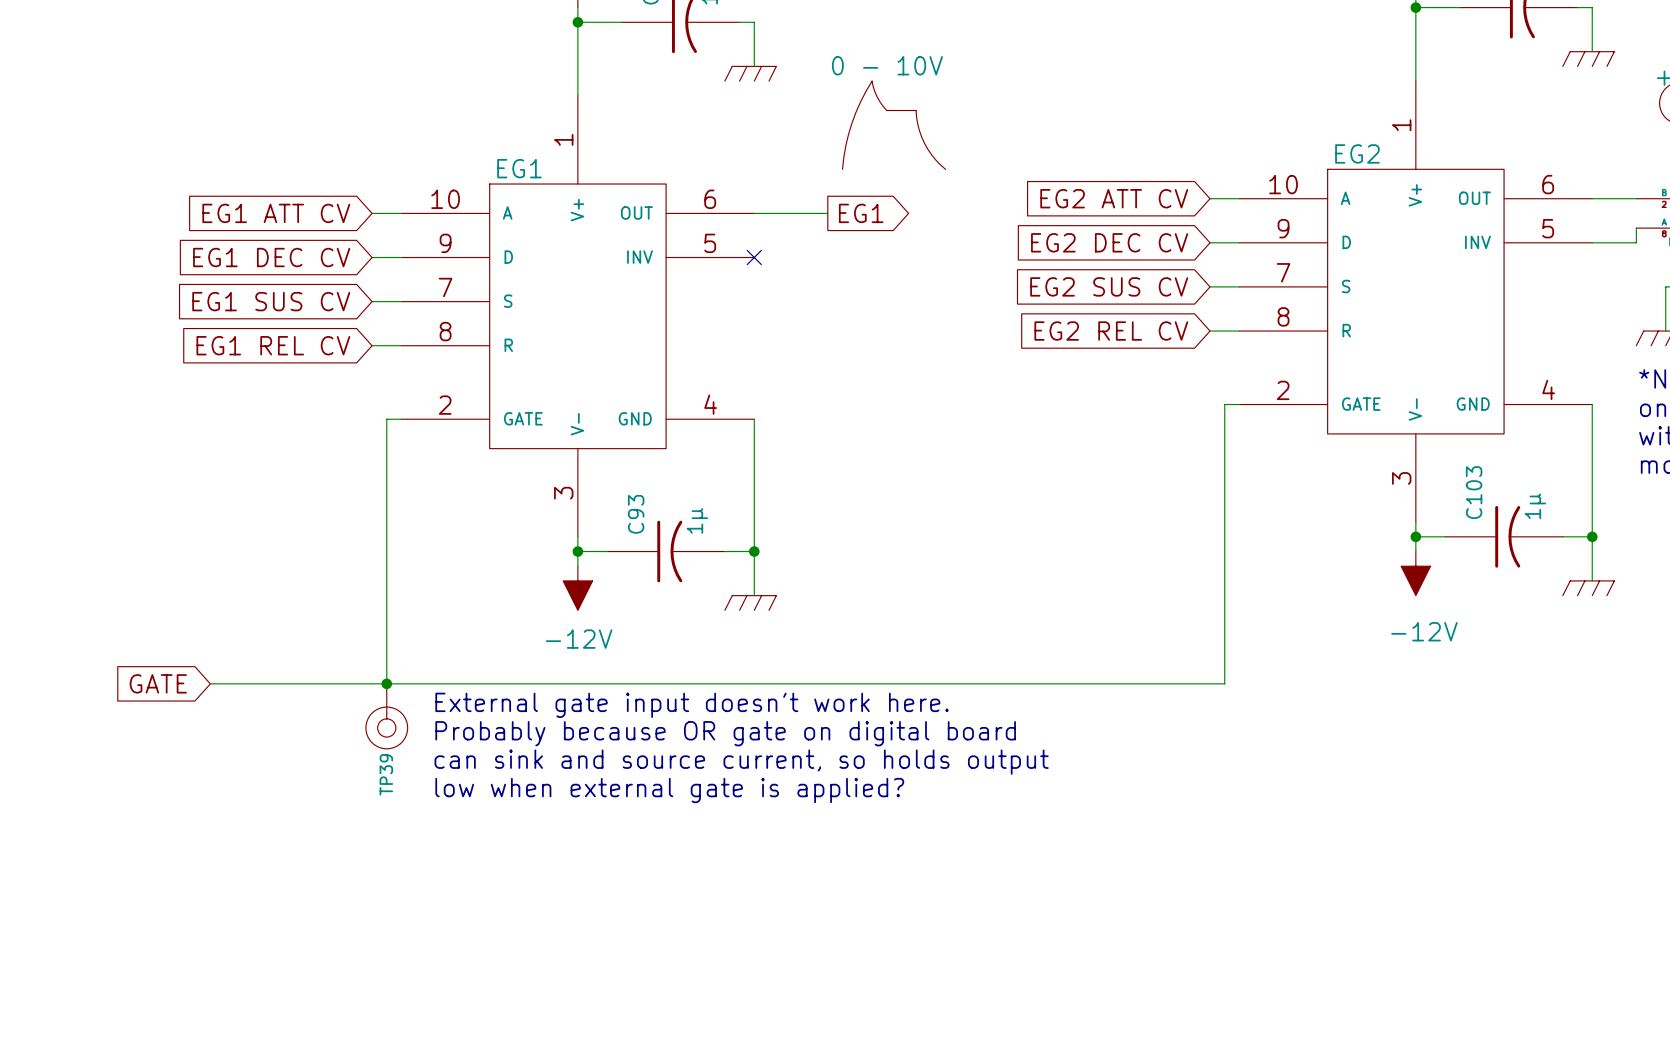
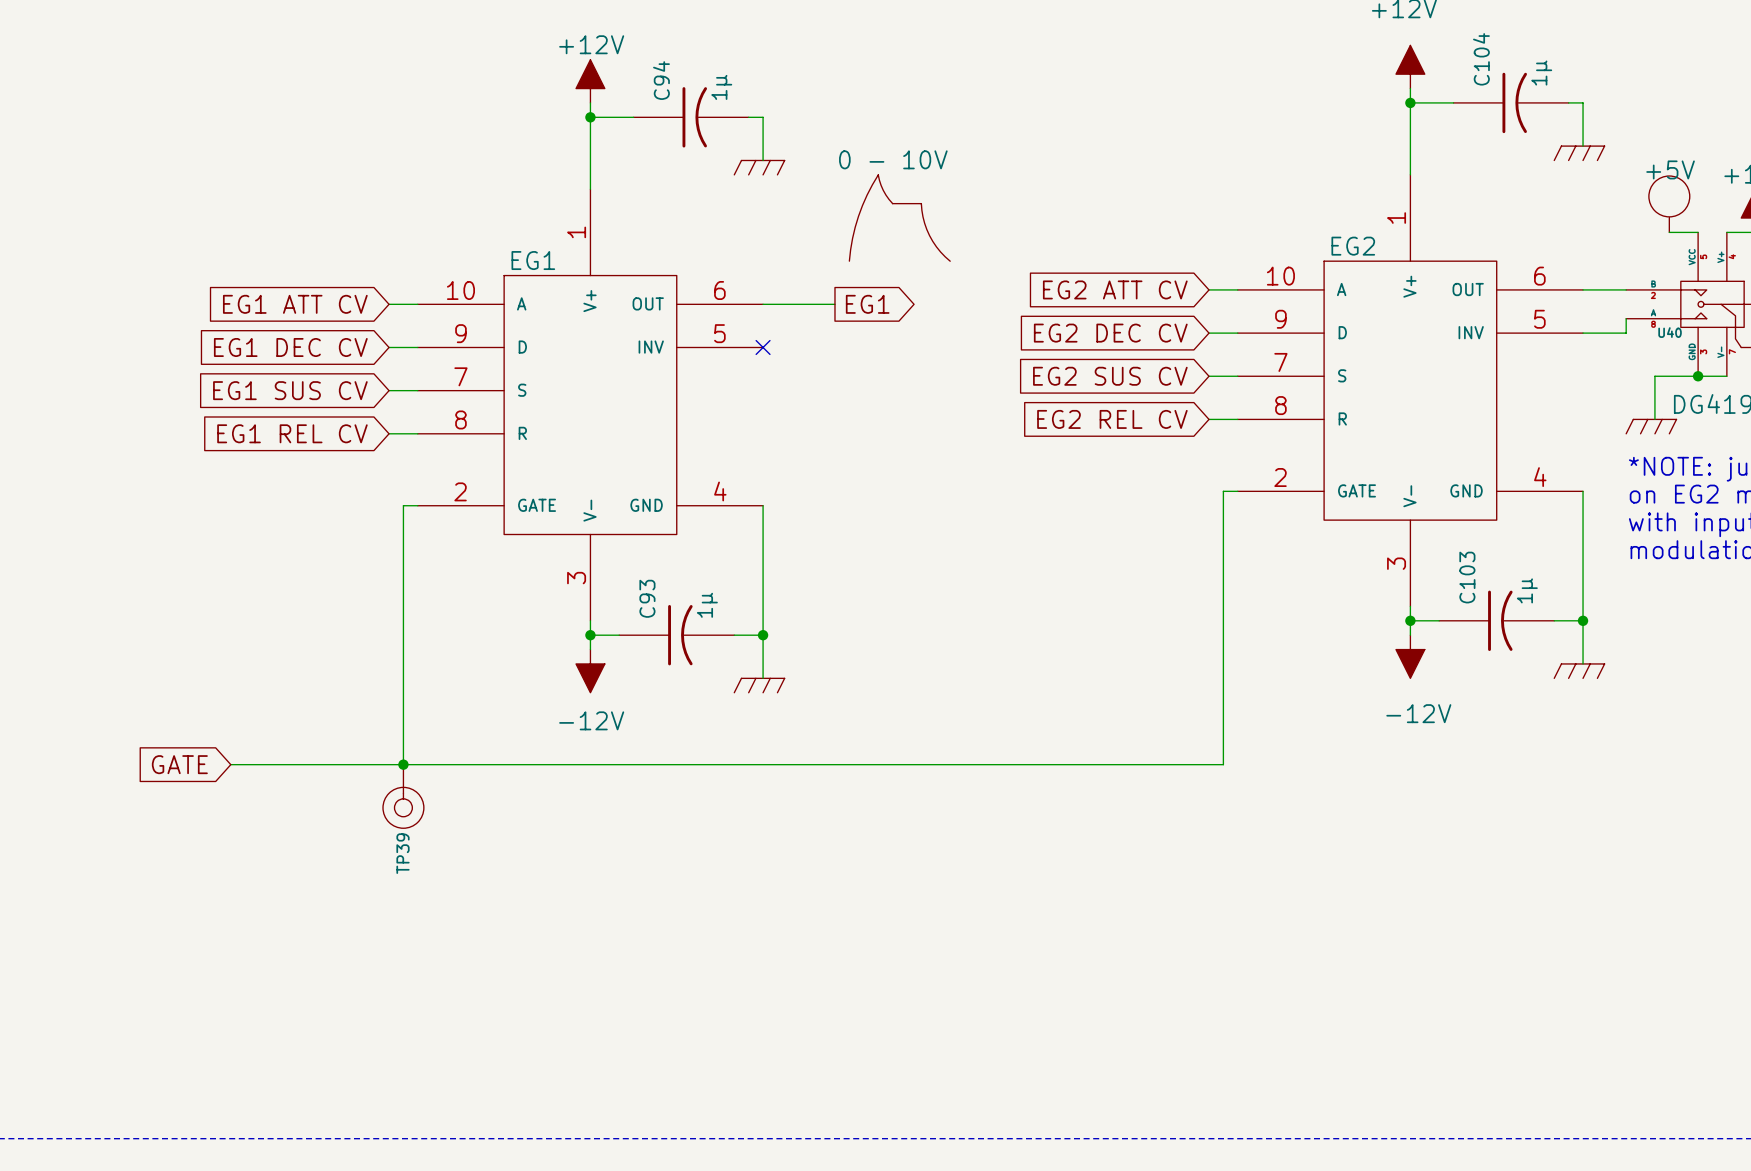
text: External gate input doesn't work here. (692, 705) -> none
text: Probably because OR gate on digital board (725, 733) -> none
text: can sink and source current, so holds output (741, 762) -> none
text: low when external gate is applied? (669, 790) -> none

